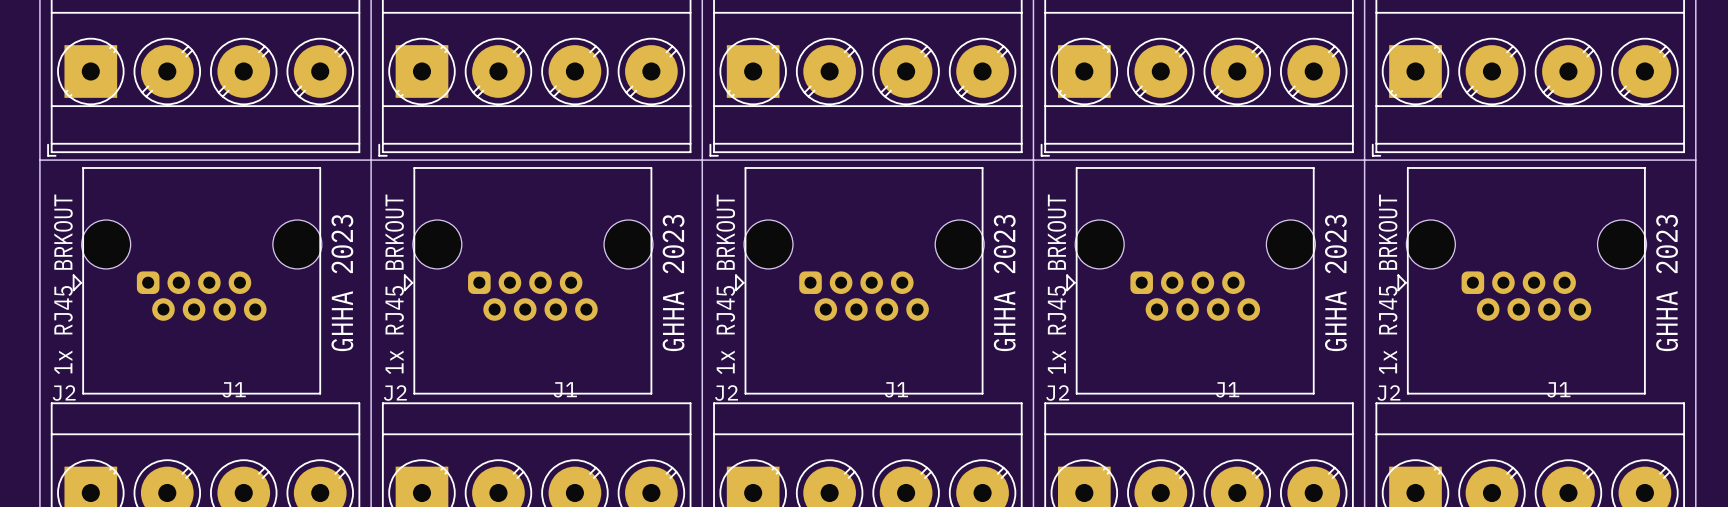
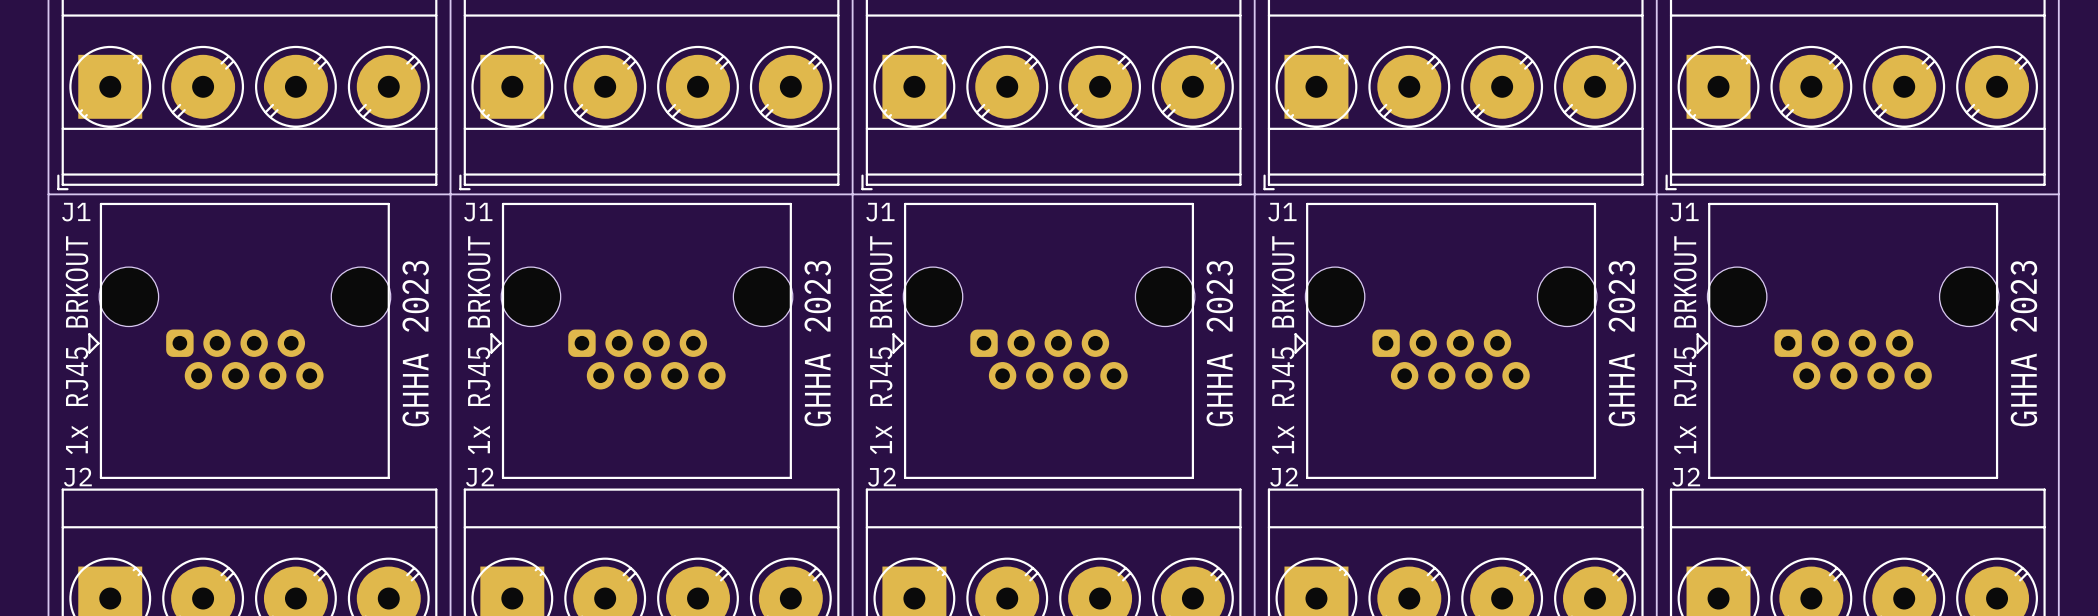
J1 name position: J1 (234, 389) -> J1 (76, 212)
J1 name position: J1 (565, 389) -> J1 (478, 212)
J1 name position: J1 (896, 389) -> J1 (880, 212)
J1 name position: J1 (1227, 389) -> J1 (1282, 212)
J1 name position: J1 (1558, 389) -> J1 (1684, 212)

